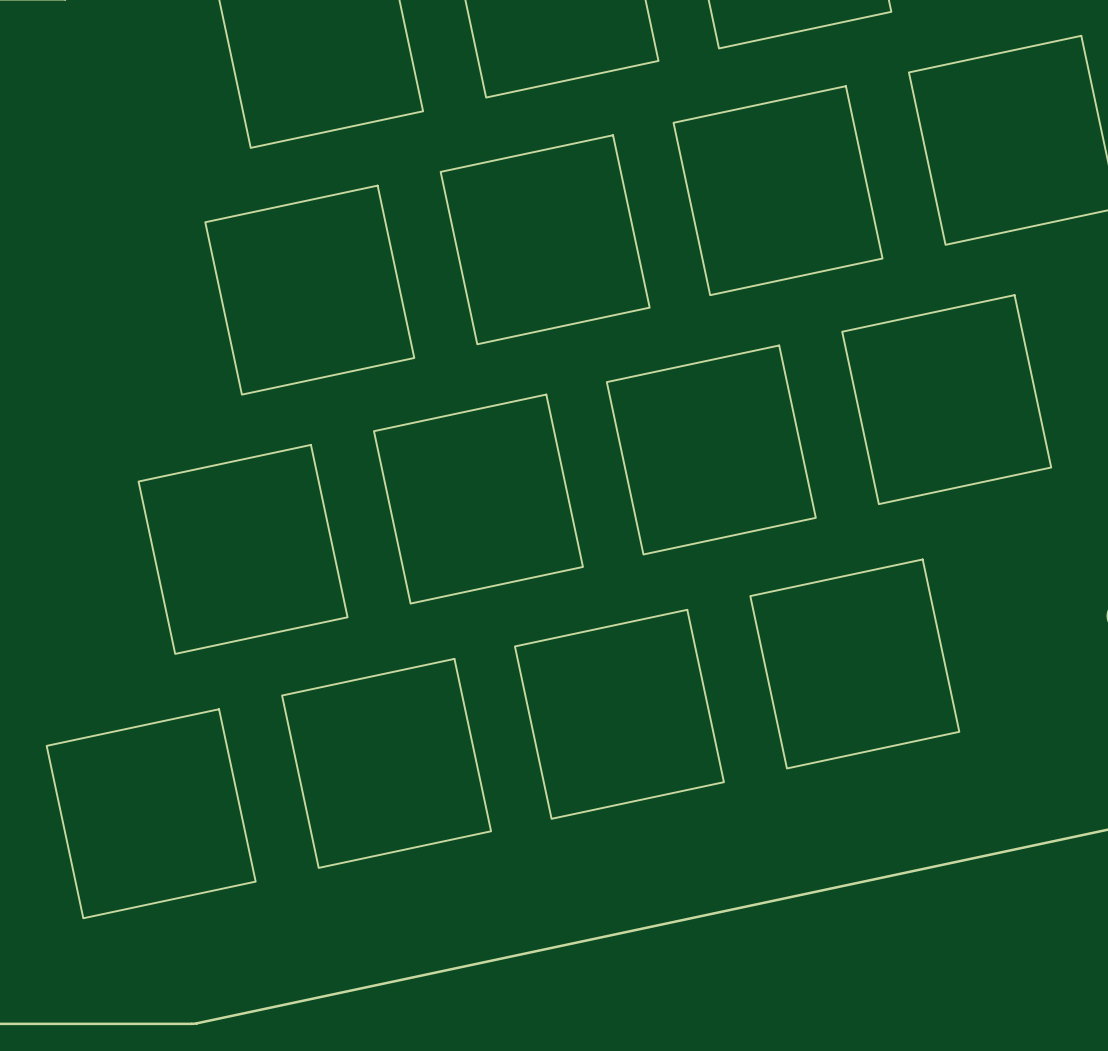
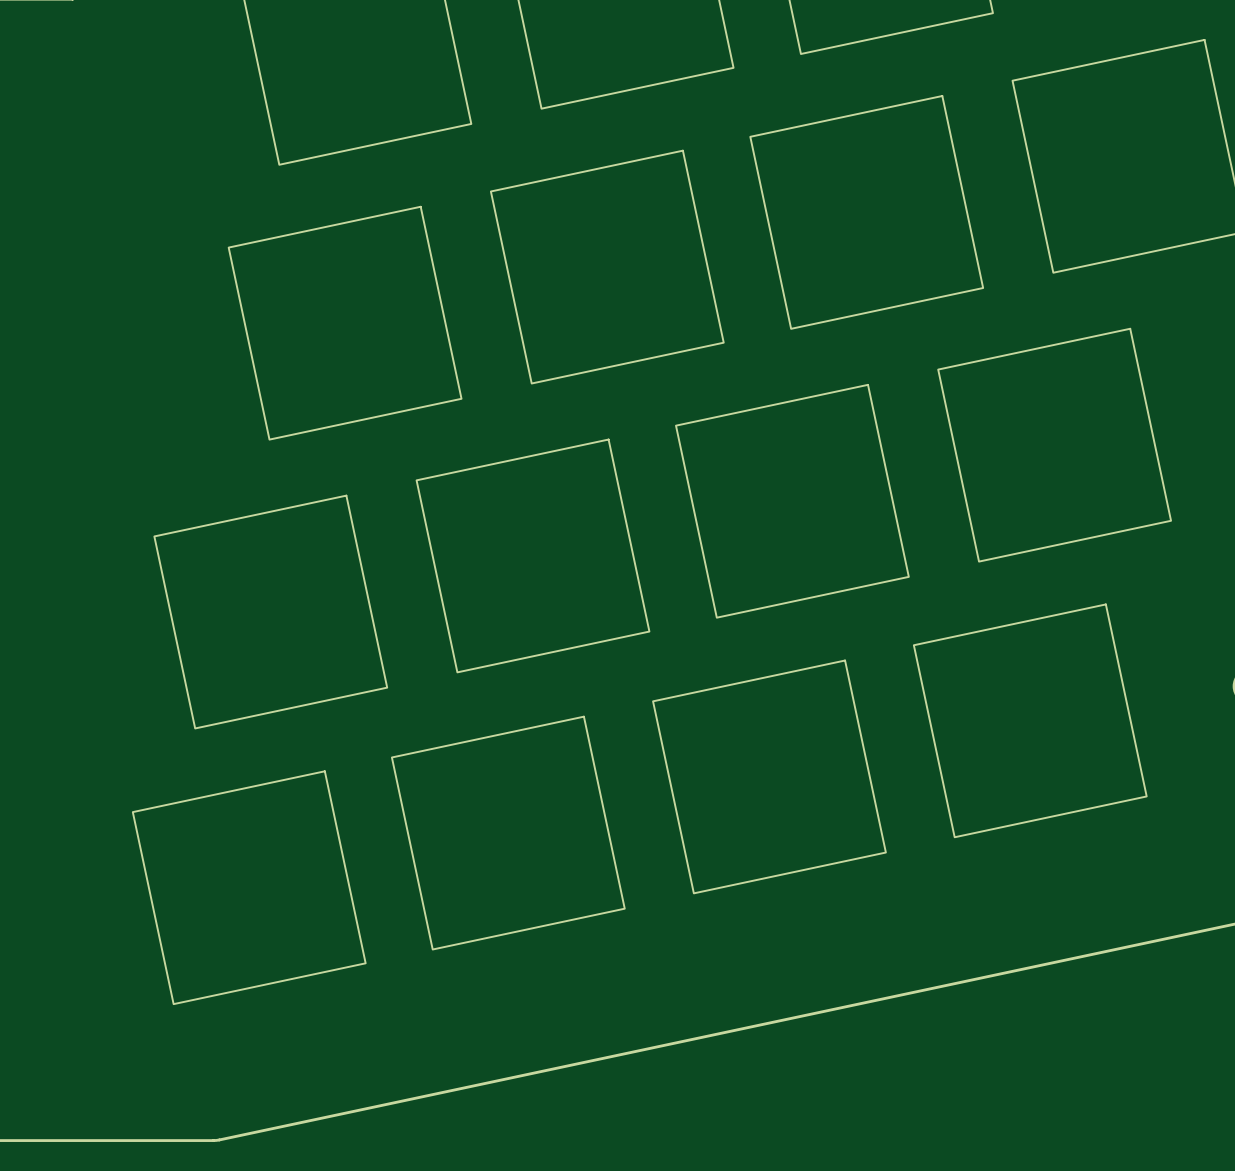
part position: (854, 663) -> (1030, 720)
part position: (619, 714) -> (769, 776)
part position: (386, 763) -> (508, 833)
part position: (151, 813) -> (249, 887)

